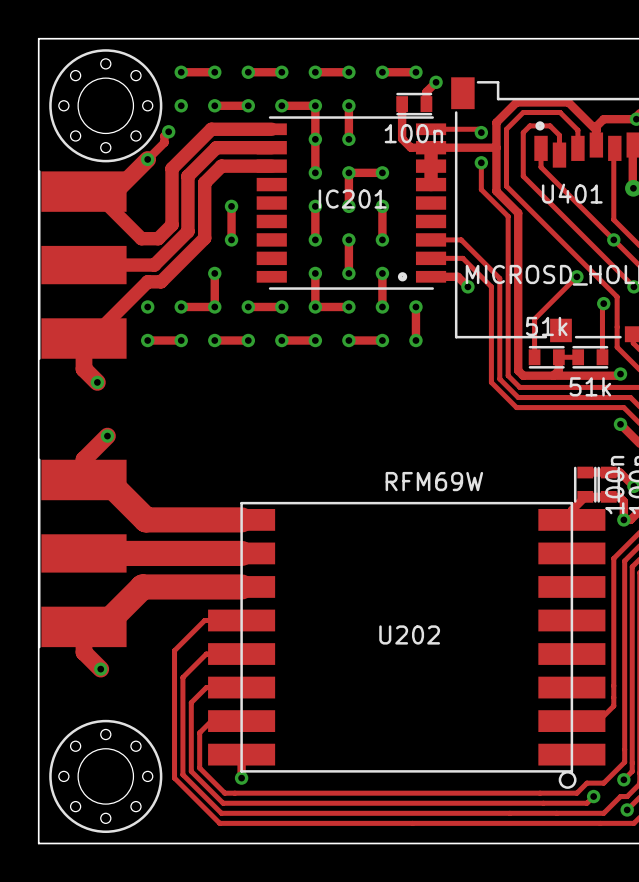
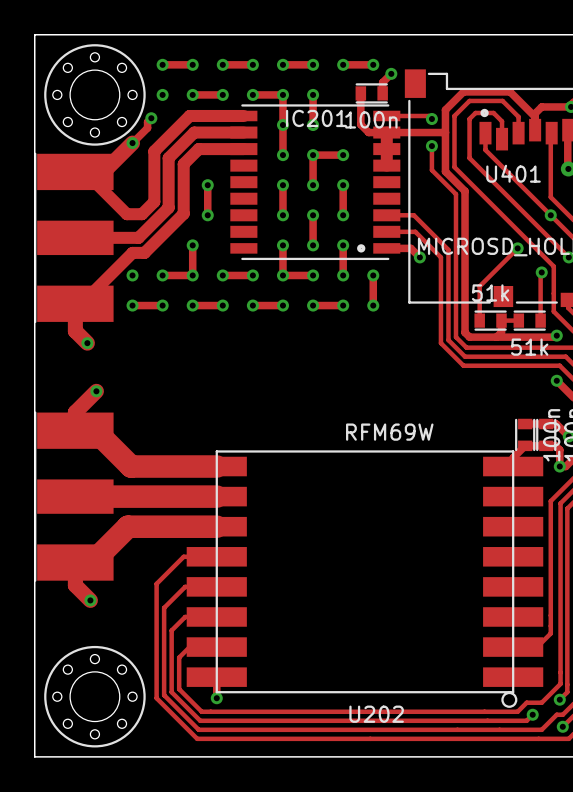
IC201 name position: IC201 (352, 199) -> IC201 (316, 118)
U202 name position: U202 (409, 634) -> U202 (376, 714)

